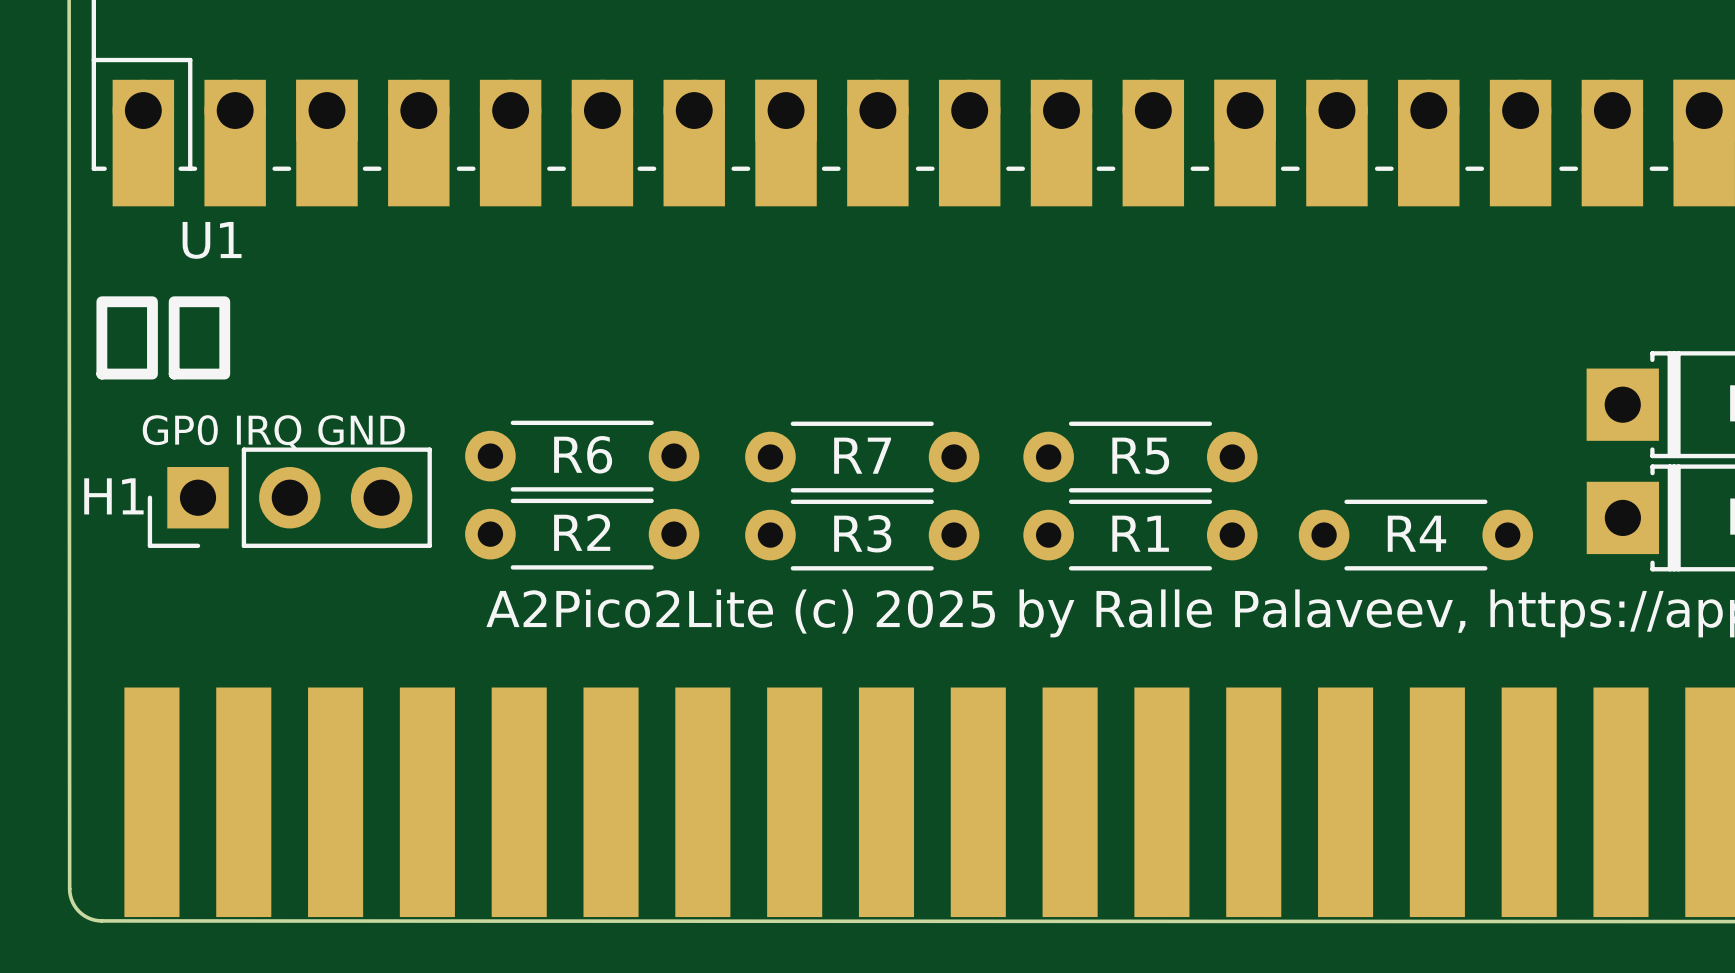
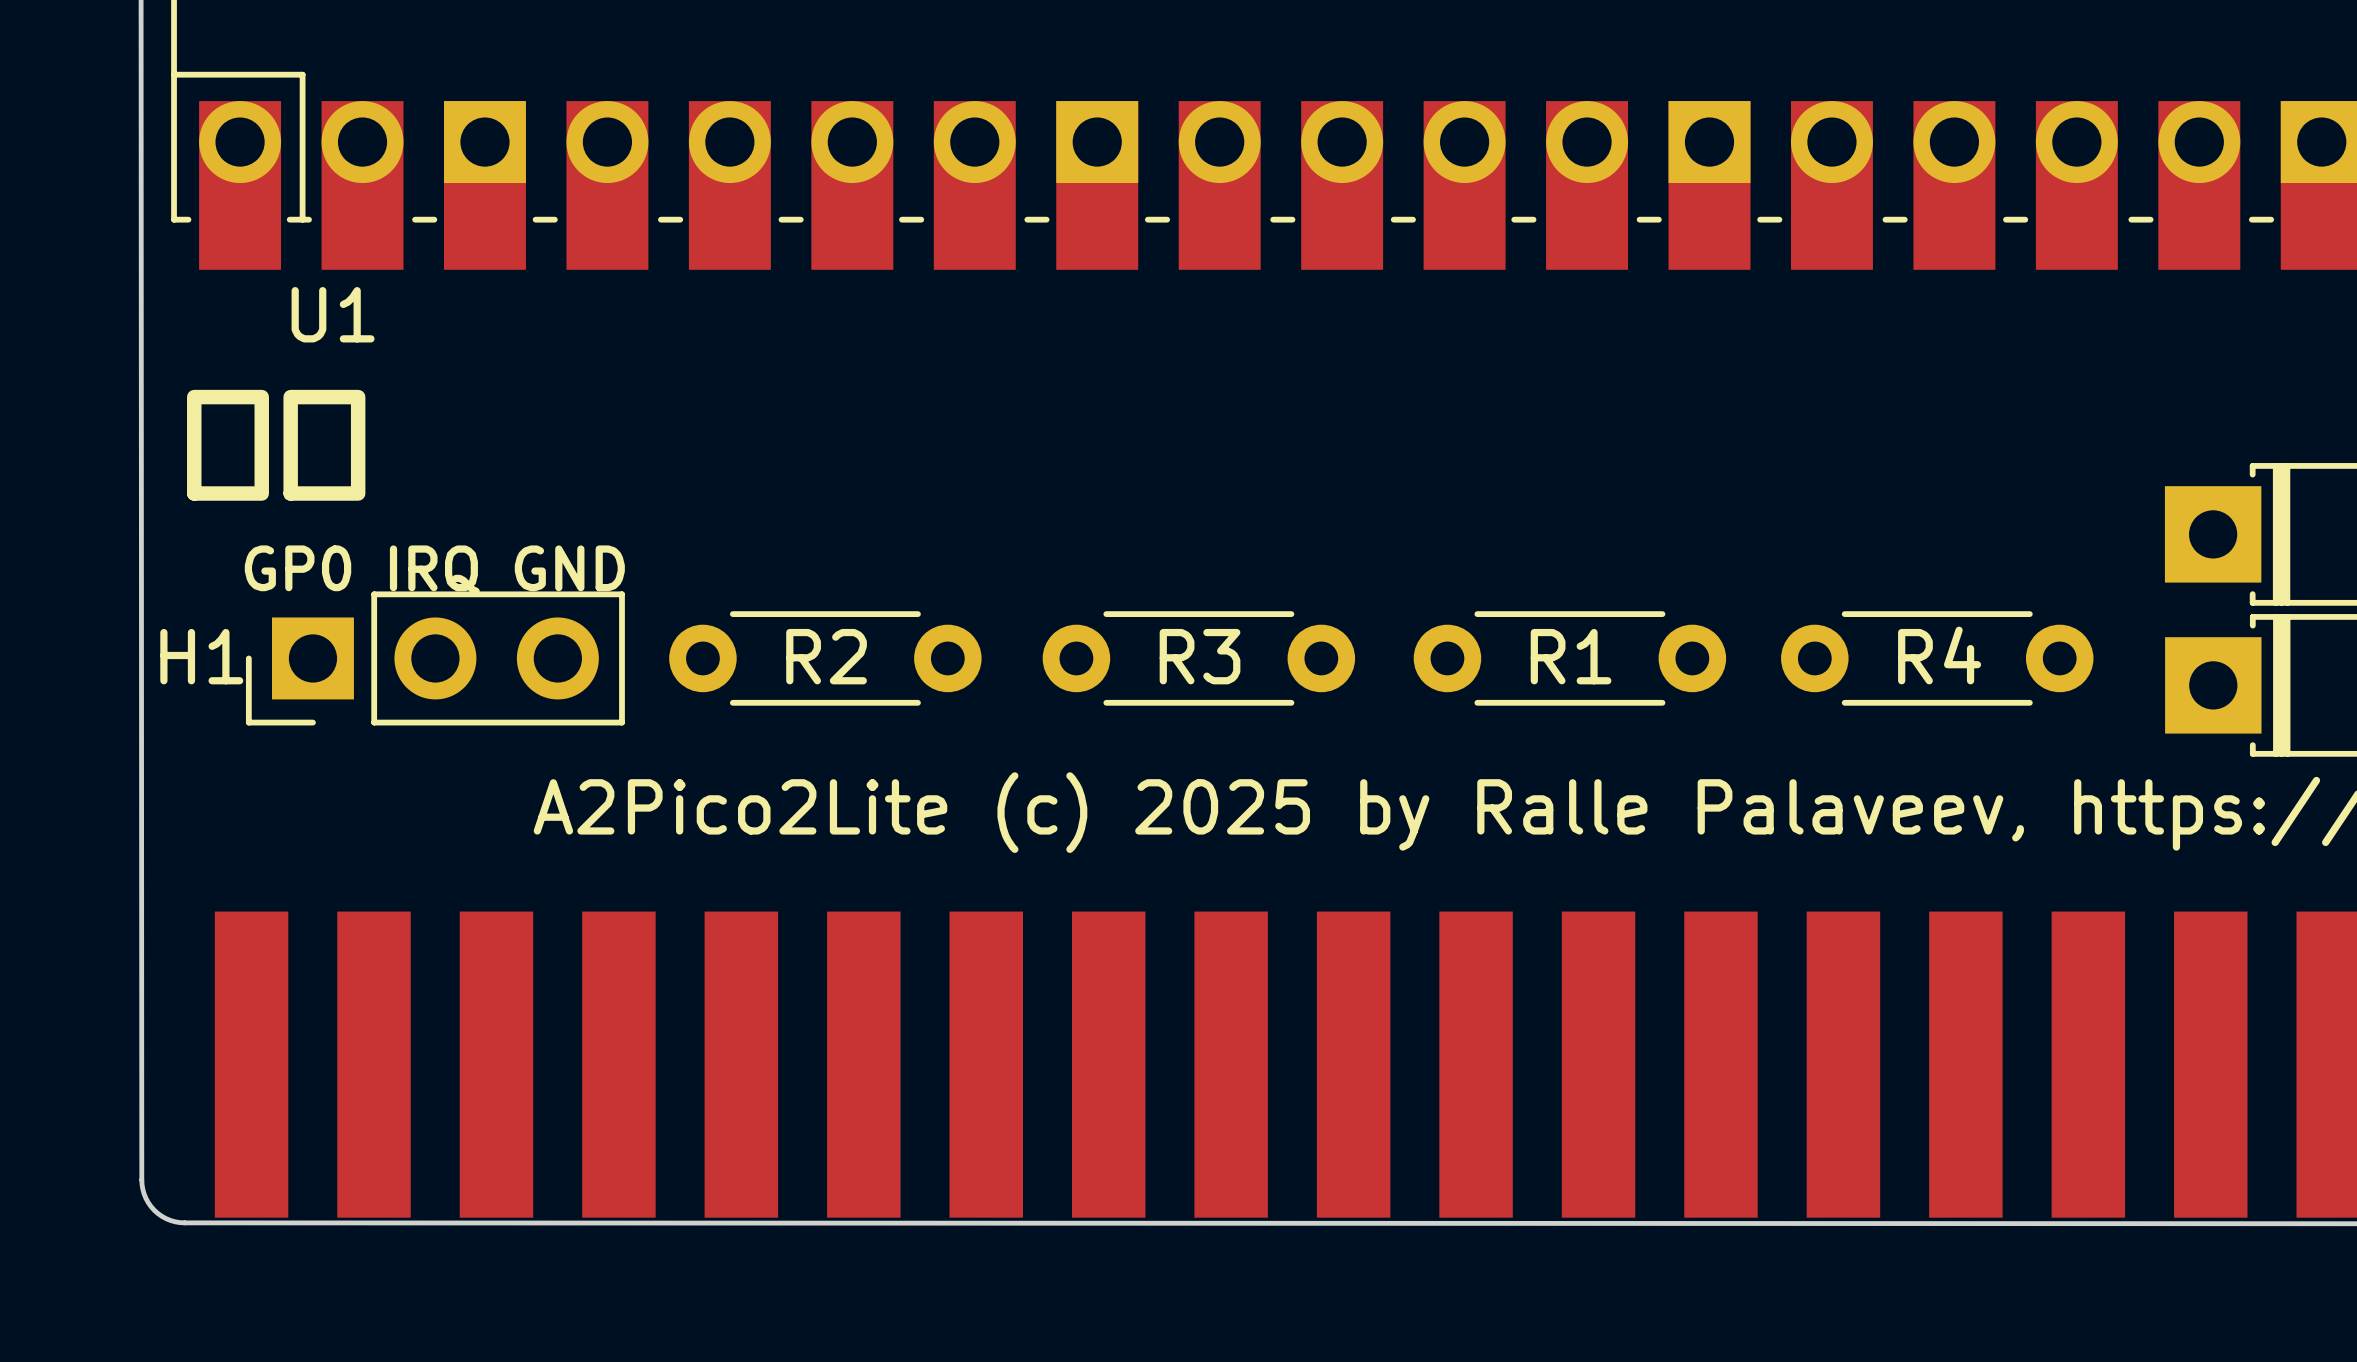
R6: (582, 456) -> none
R7: (862, 457) -> none
R5: (1140, 457) -> none
R2 position: (582, 534) -> (825, 658)
R3 position: (862, 535) -> (1198, 658)
R1 position: (1140, 535) -> (1569, 658)
R4 position: (1415, 535) -> (1937, 658)

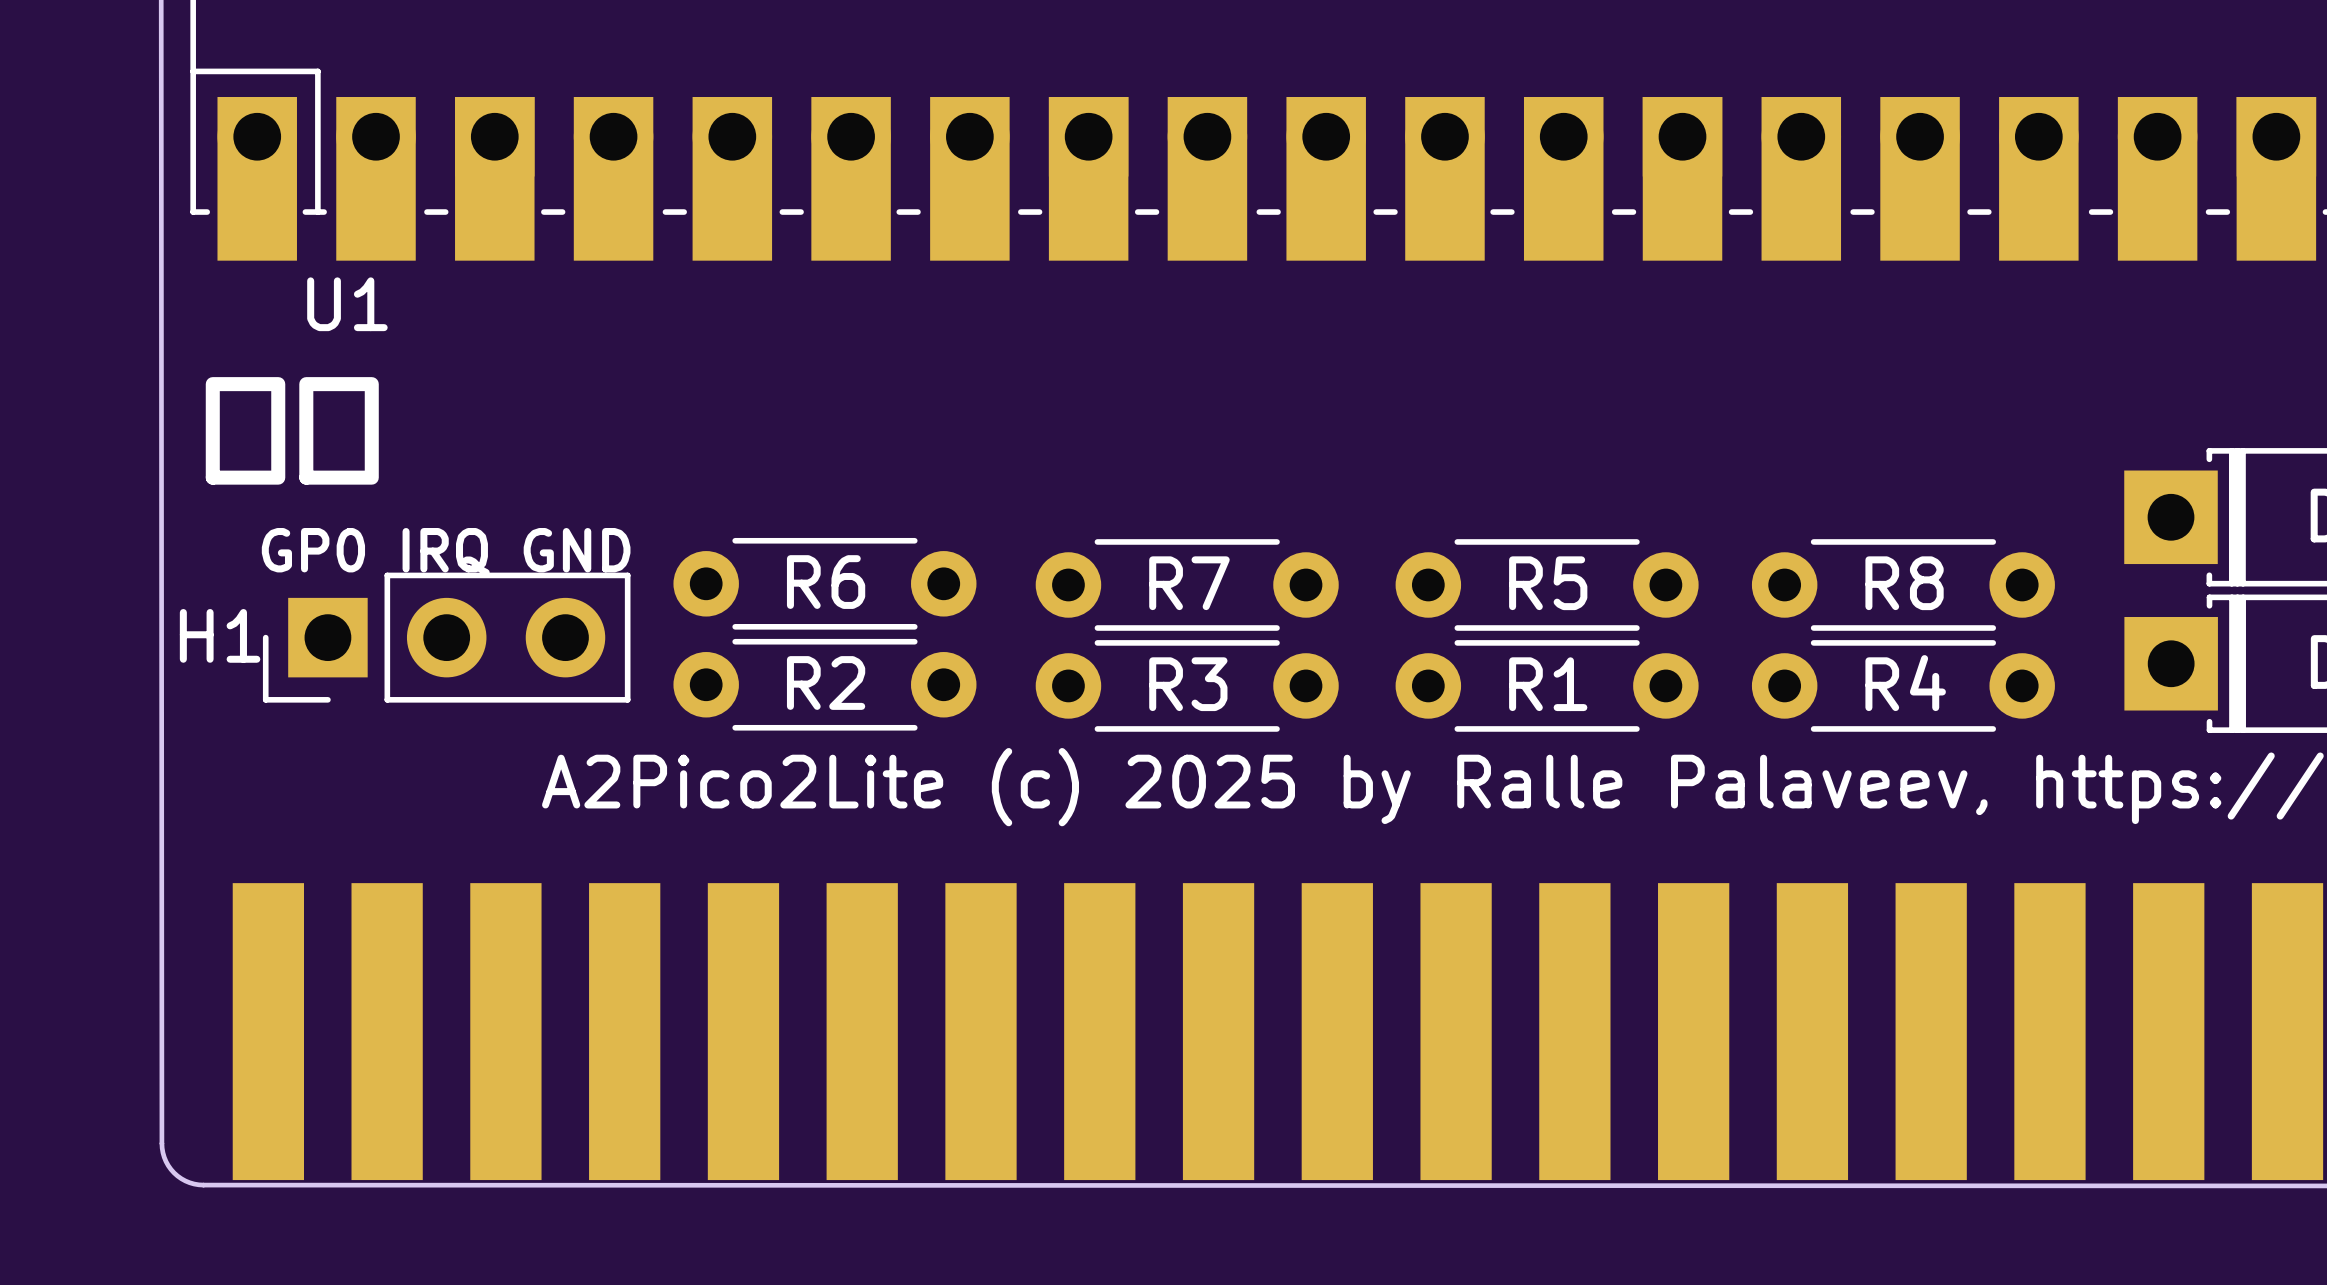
R6: none -> (824, 583)
R7: none -> (1187, 584)
R5: none -> (1547, 584)
R8: none -> (1903, 584)
R2 position: (825, 658) -> (824, 684)
R3 position: (1198, 658) -> (1187, 685)
R1 position: (1569, 658) -> (1547, 685)
R4 position: (1937, 658) -> (1903, 685)

